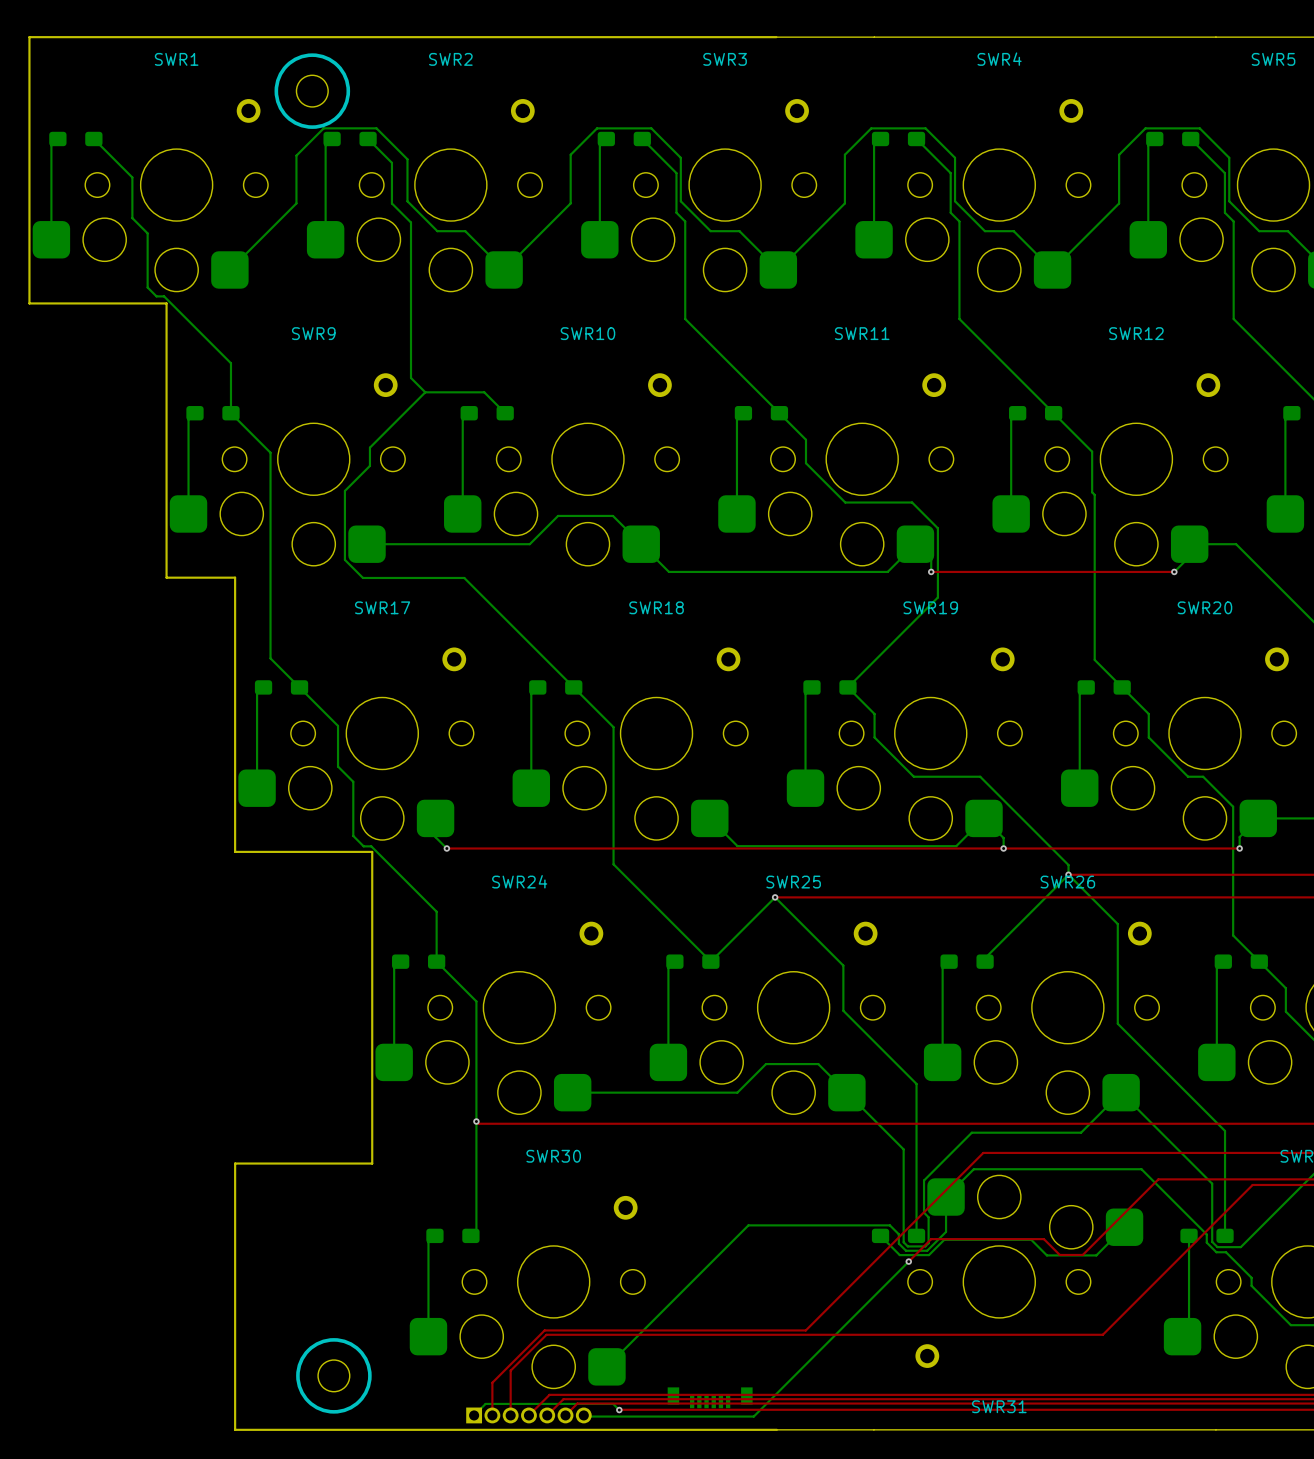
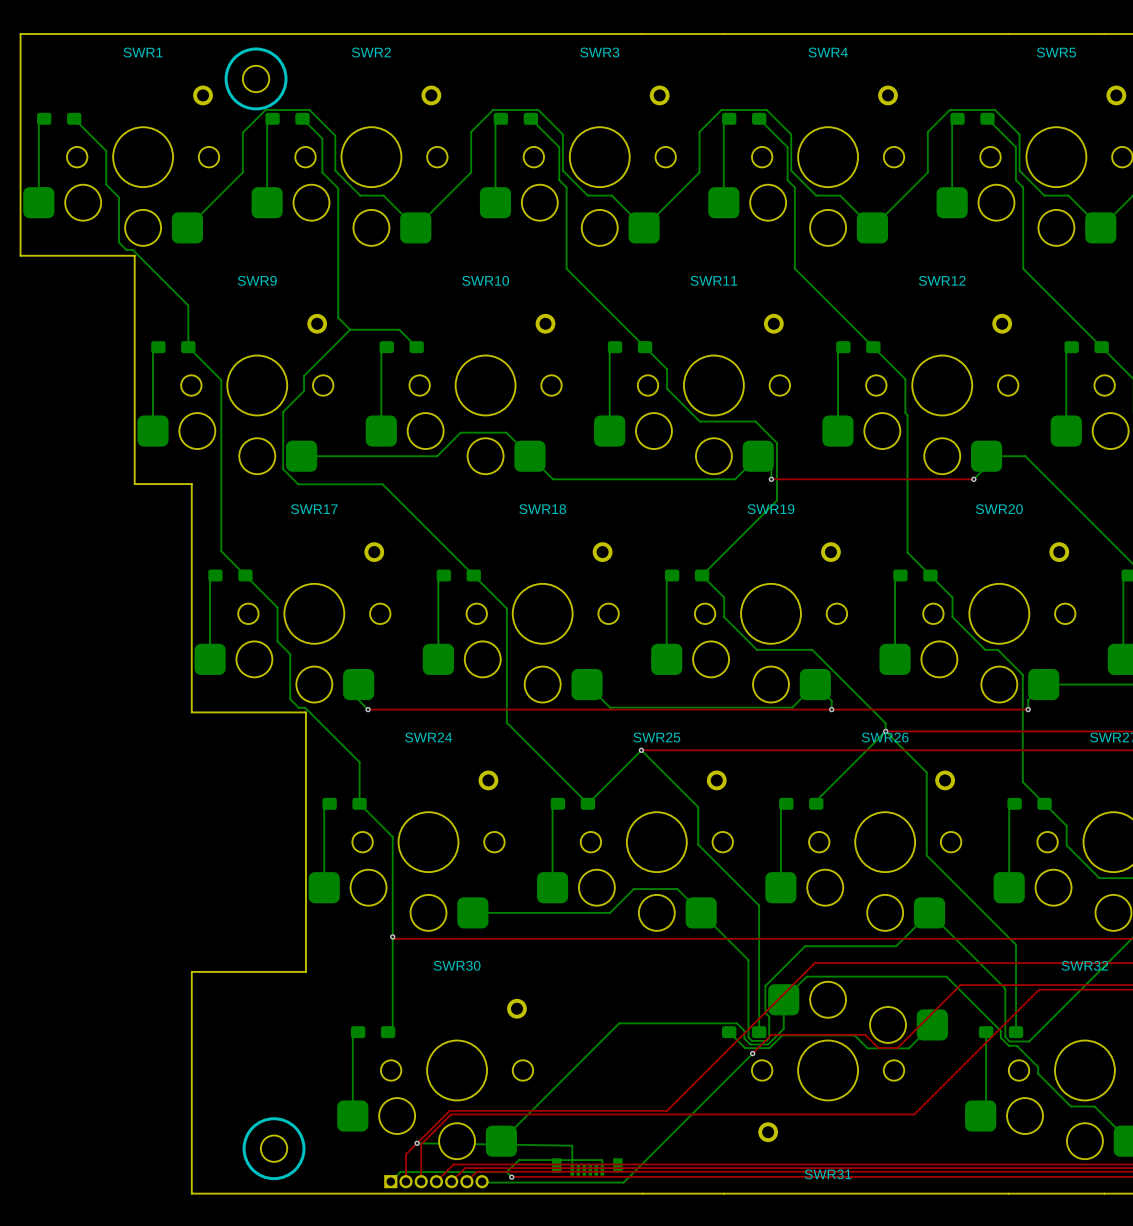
bottom track: none -> (417, 1143) (572, 1145) (572, 1170)
via: none -> (417, 1143)
bottom track: none -> (602, 1170) (602, 1160) (518, 1160) (506, 1172)

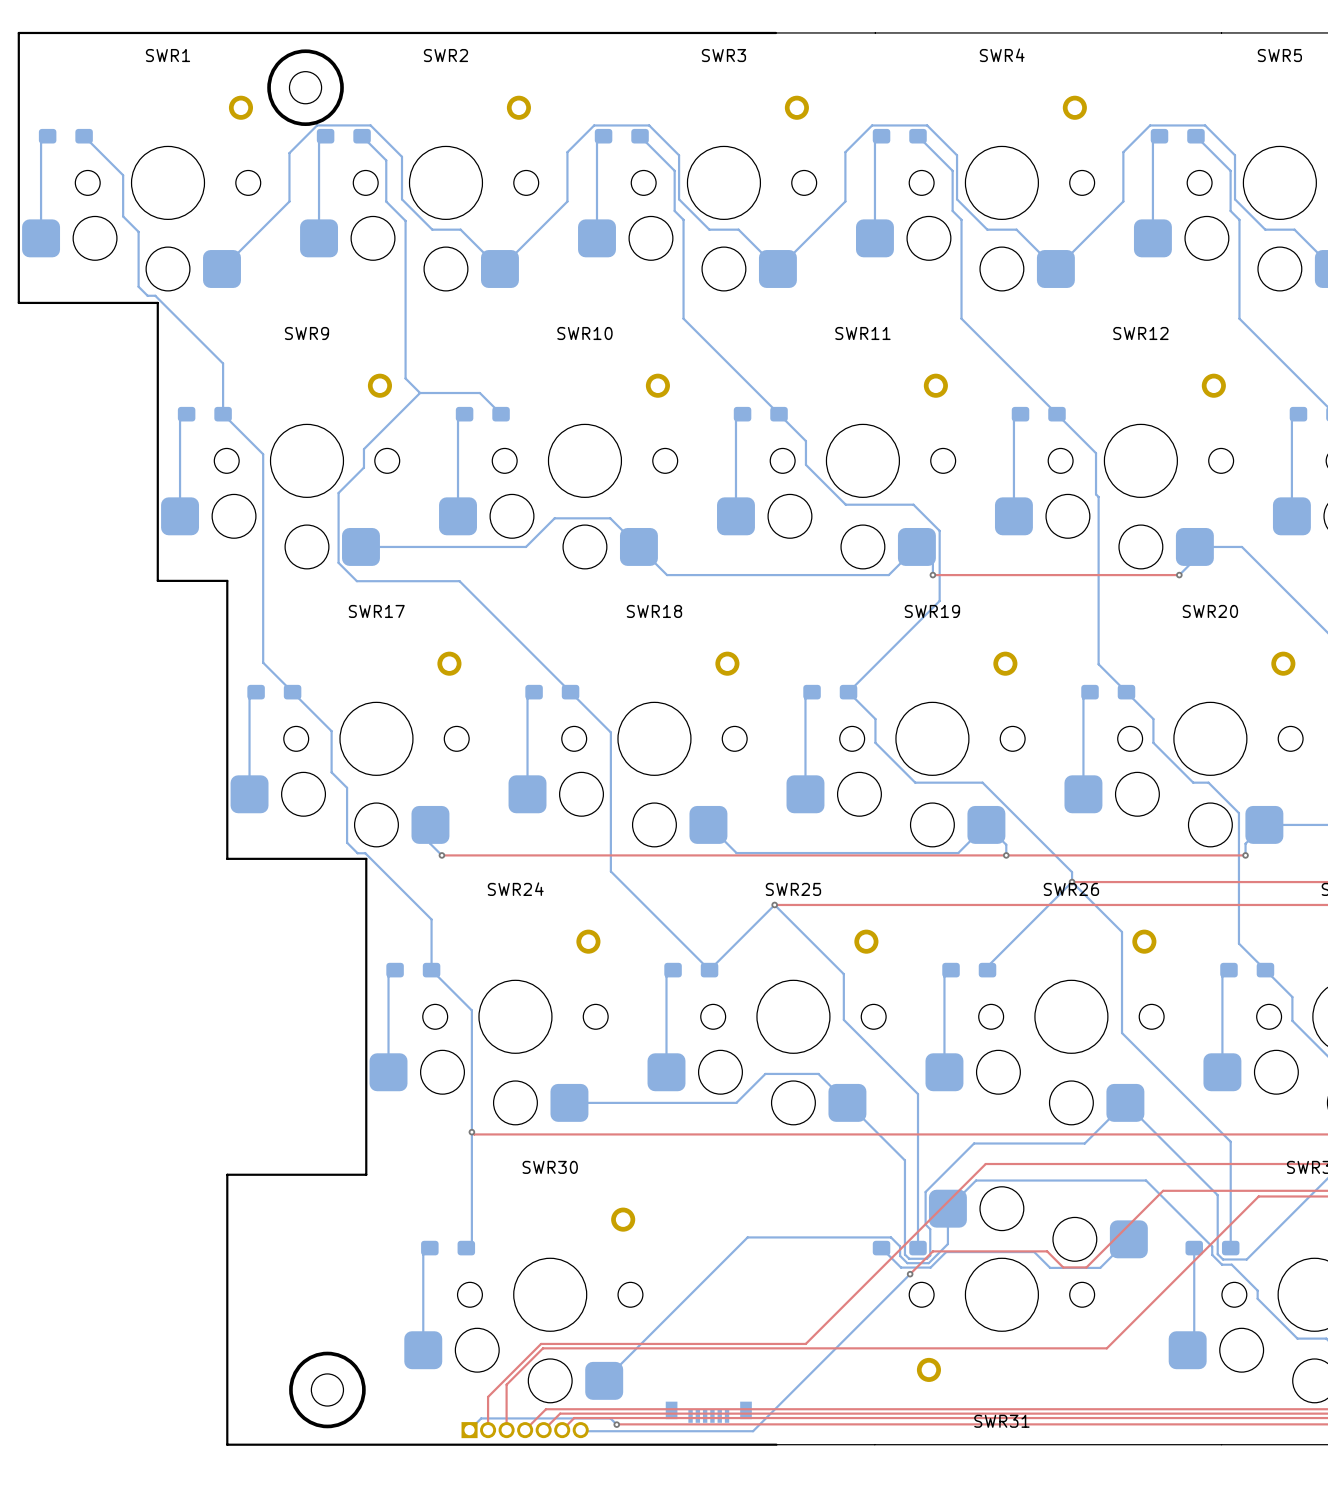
bottom track: (417, 1143) (572, 1145) (572, 1170) -> none
via: (417, 1143) -> none
bottom track: (602, 1170) (602, 1160) (518, 1160) (506, 1172) -> none

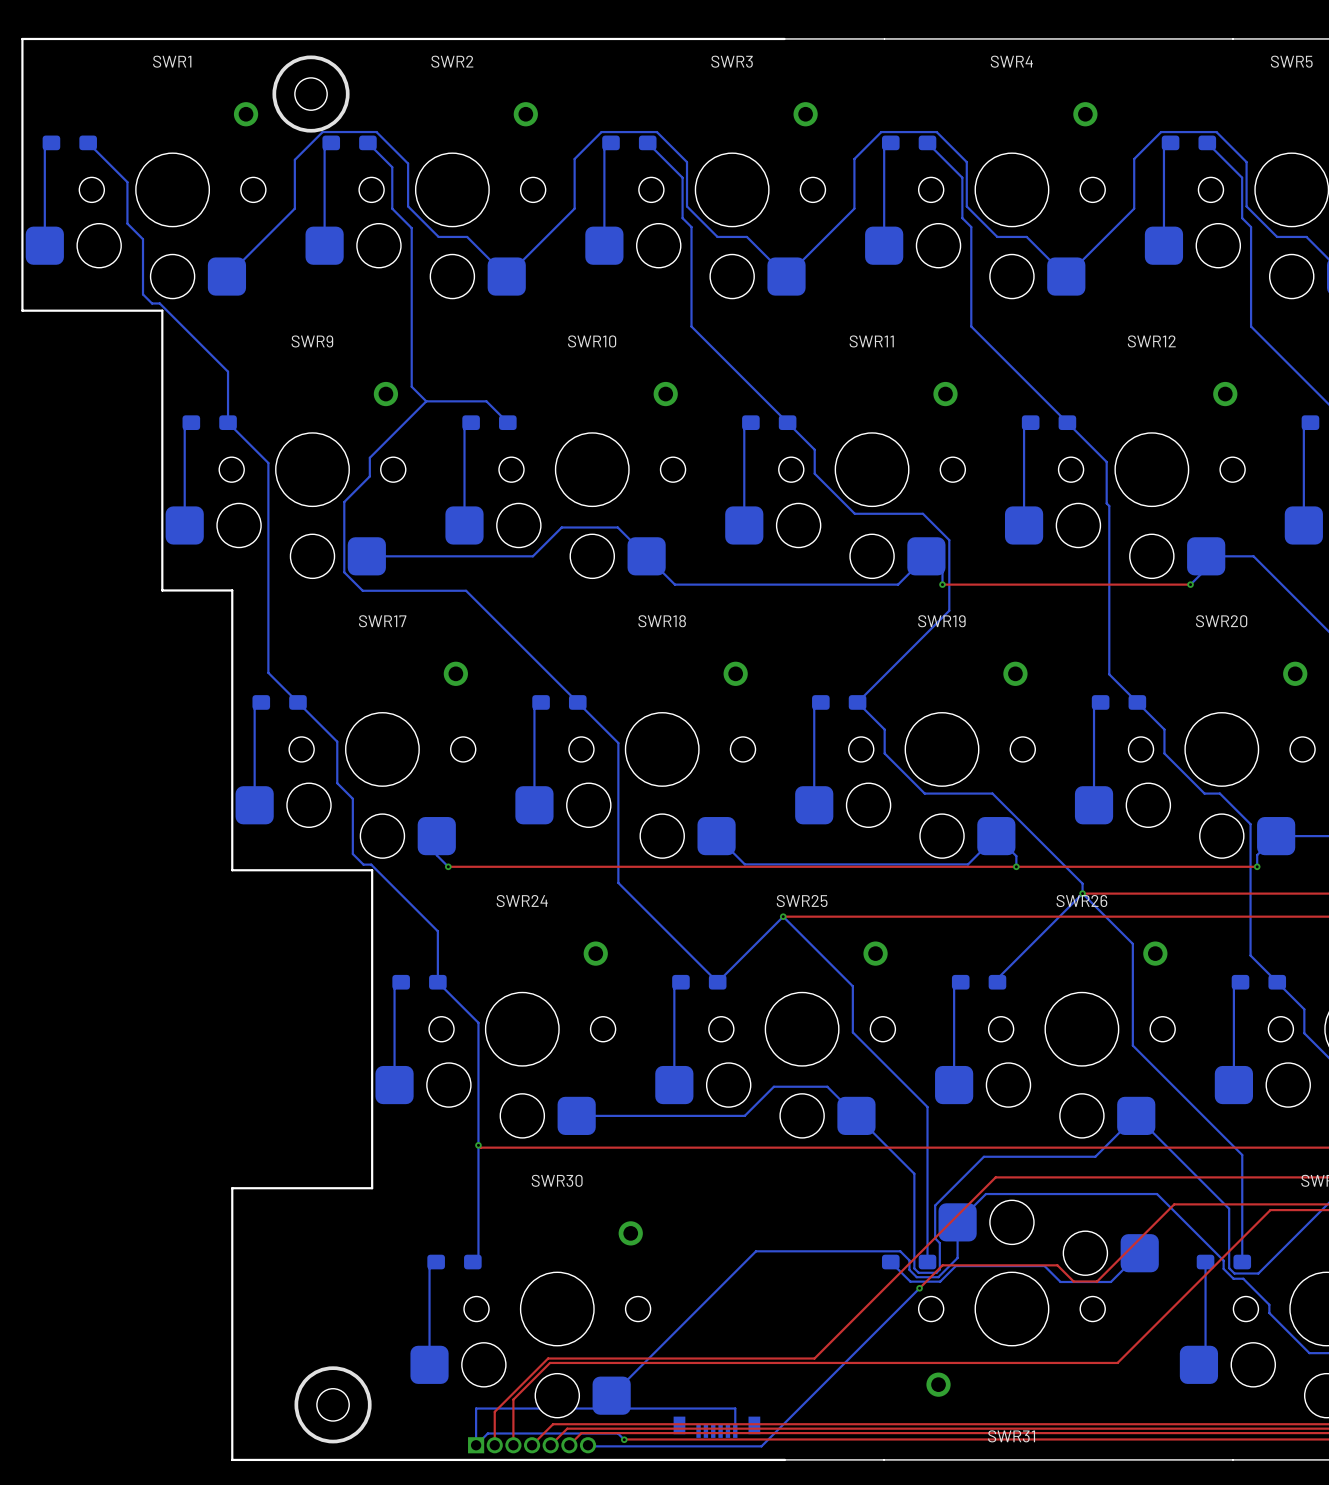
bottom track: none -> (735, 1431) (735, 1408) (476, 1408) (476, 1445)

